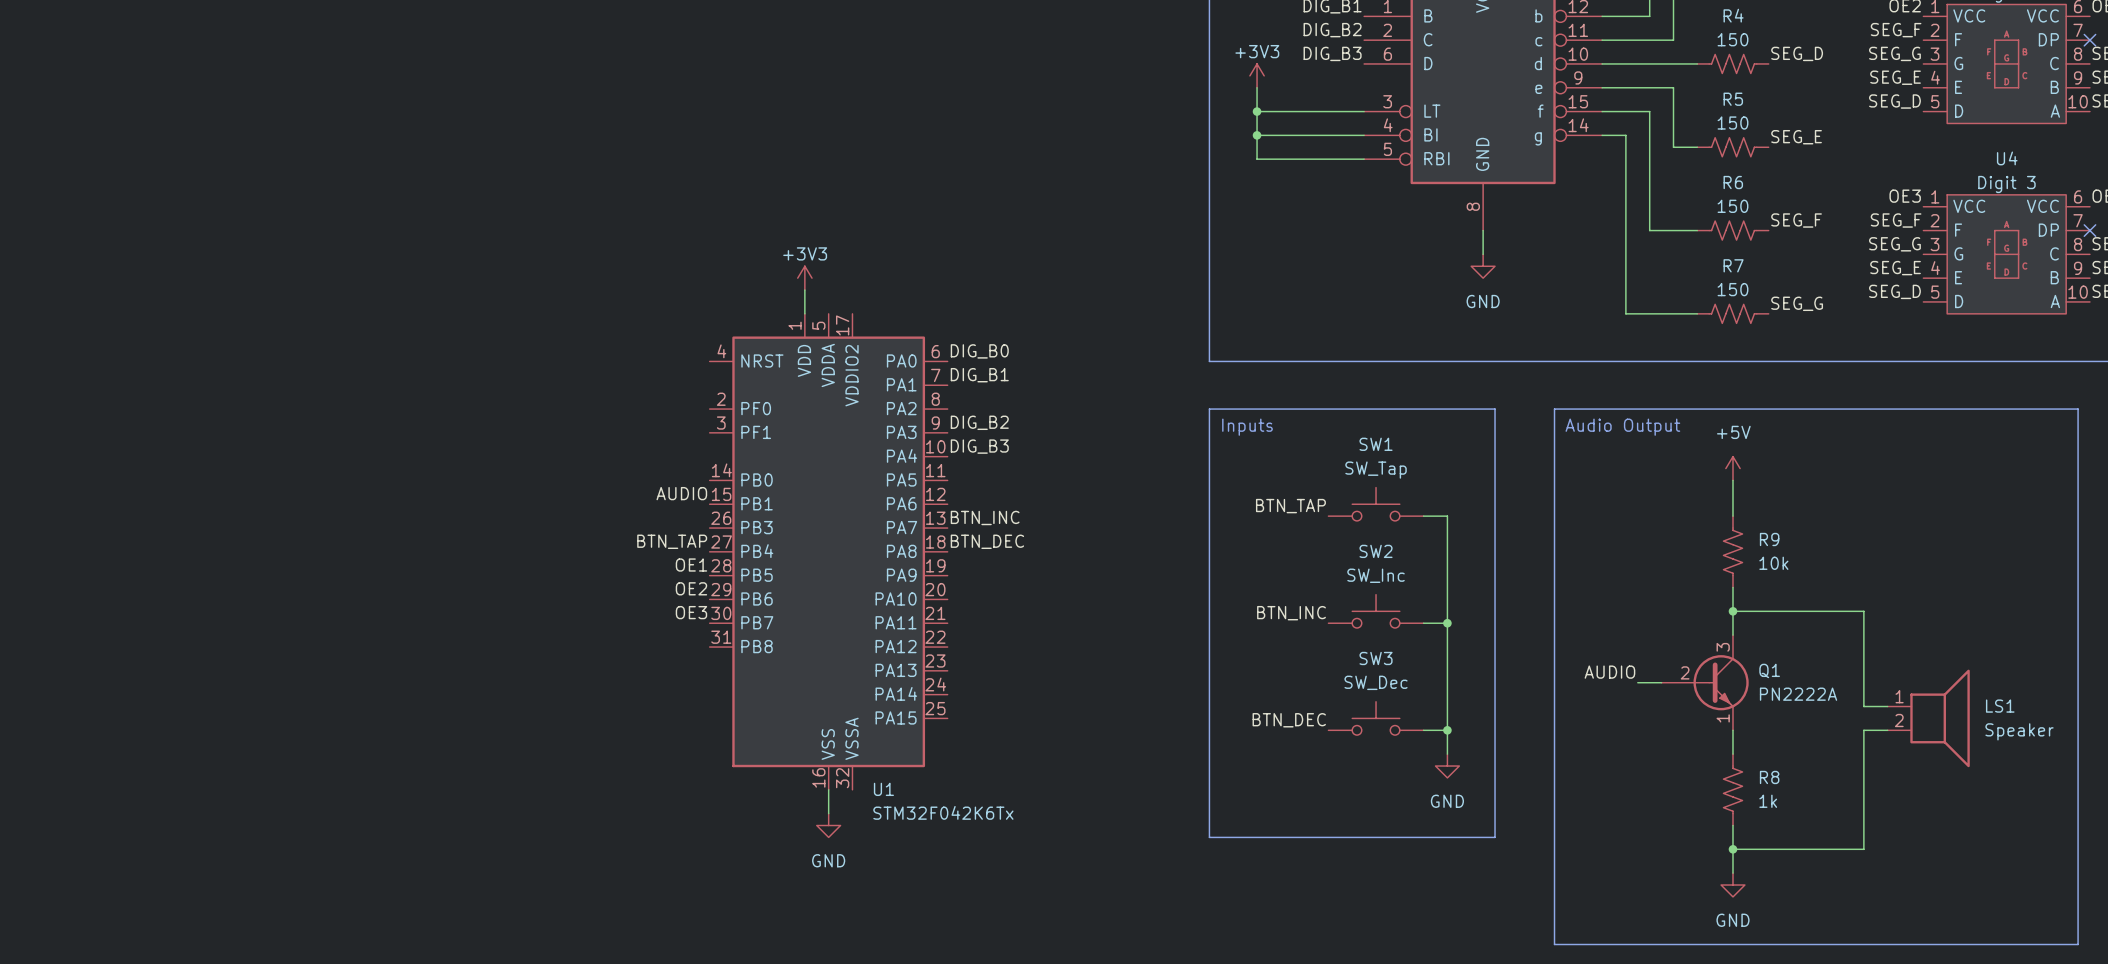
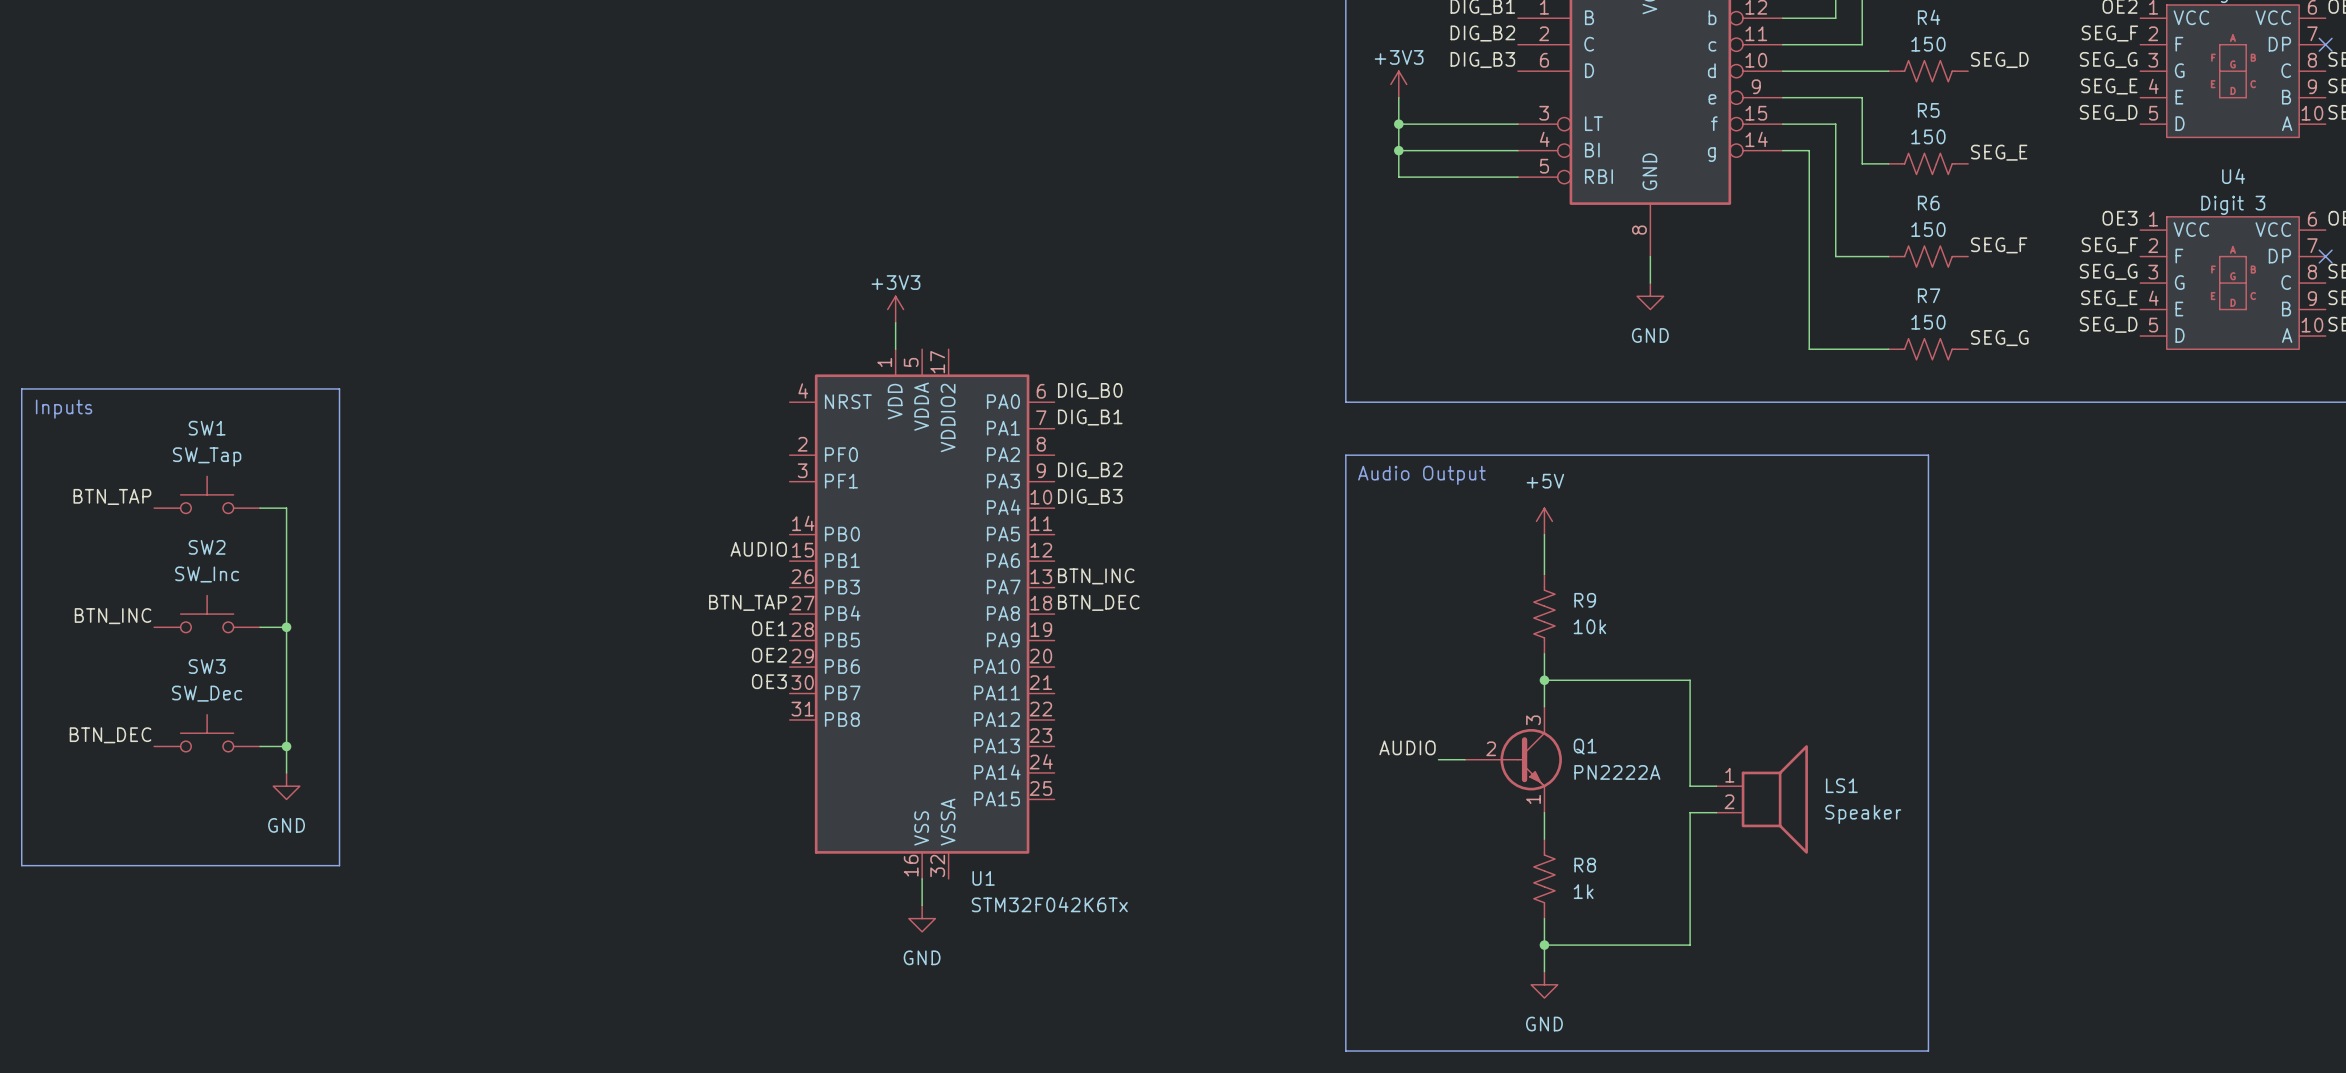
line: none -> (21, 388) (339, 388) (339, 865) (21, 865) (21, 388)
text: none -> Inputs (64, 409)
line: (1495, 409) (1495, 837) (1209, 837) -> (1729, 1051) (1345, 1051) (1345, 931)
line: (1554, 409) (1554, 944) -> (1729, 455) (1663, 455)
line: (1732, 409) (2078, 409) (2078, 944) (1732, 944) -> (1928, 455) (1928, 1051)
text: Inputs (1247, 427) -> Audio Output (1421, 475)
text: Audio Output (1622, 427) -> none
label: none -> BTN_TAP (112, 496)
wire: none -> (260, 508) (286, 508) (286, 772)
power symbol: none -> +5V (1544, 521)
power symbol: +5V (1732, 468) -> none
wire: none -> (1544, 534) (1544, 574)
SW1 position: (1376, 504) -> (207, 494)
label: BTN_TAP (1290, 506) -> none
wire: (1423, 516) (1447, 516) (1447, 754) -> none
R9 position: (1732, 551) -> (1544, 614)
label: none -> BTN_INC (113, 616)
wire: none -> (260, 627) (286, 627)
junction: none -> (286, 627)
wire: none -> (1544, 653) (1544, 706)
SW2 position: (1376, 611) -> (207, 614)
wire: none -> (1544, 680) (1690, 680) (1690, 786) (1716, 786)
junction: none -> (1544, 680)
wire: (1732, 611) (1863, 611) (1863, 706) (1887, 706) -> none
junction: (1732, 611) -> none
label: BTN_INC (1291, 613) -> none
wire: (1423, 623) (1447, 623) -> none
junction: (1447, 623) -> none
label: none -> BTN_DEC (110, 735)
wire: none -> (260, 746) (286, 746)
junction: none -> (286, 746)
label: none -> AUDIO (1407, 747)
label: AUDIO (1609, 672) -> none
wire: (1637, 682) (1661, 682) -> none
Q1 position: (1705, 682) -> (1513, 759)
power symbol: none -> GND (286, 786)
SW3 position: (1376, 718) -> (207, 733)
LS1 position: (1928, 718) -> (1762, 799)
label: BTN_DEC (1289, 720) -> none
wire: none -> (1544, 812) (1544, 839)
wire: (1423, 730) (1447, 730) -> (1438, 759) (1464, 759)
junction: (1447, 730) -> none
wire: none -> (1716, 812) (1690, 812) (1690, 945) (1544, 945)
wire: (1887, 730) (1863, 730) (1863, 849) (1732, 849) -> none
power symbol position: GND (1447, 766) -> GND (1544, 984)
R8 position: (1732, 789) -> (1544, 878)
wire: none -> (1544, 918) (1544, 971)
junction: none -> (1544, 945)
junction: (1732, 849) -> none
power symbol: GND (1732, 885) -> none

